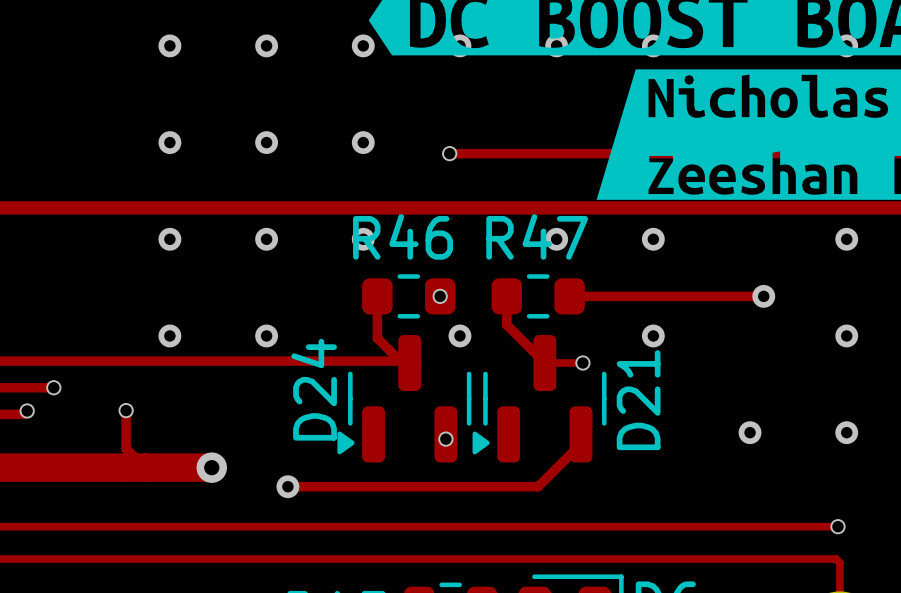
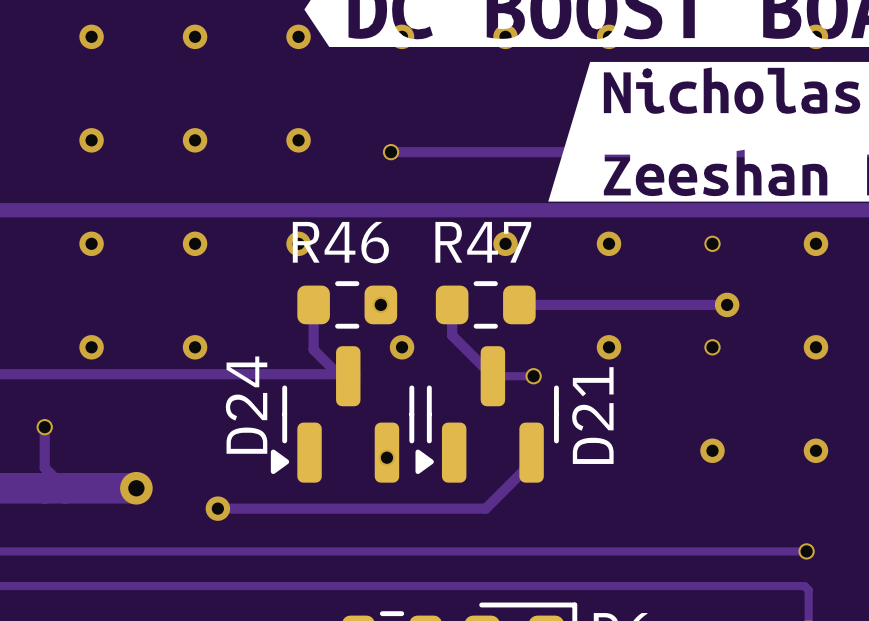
via: none -> (712, 243)
via: none -> (712, 347)

